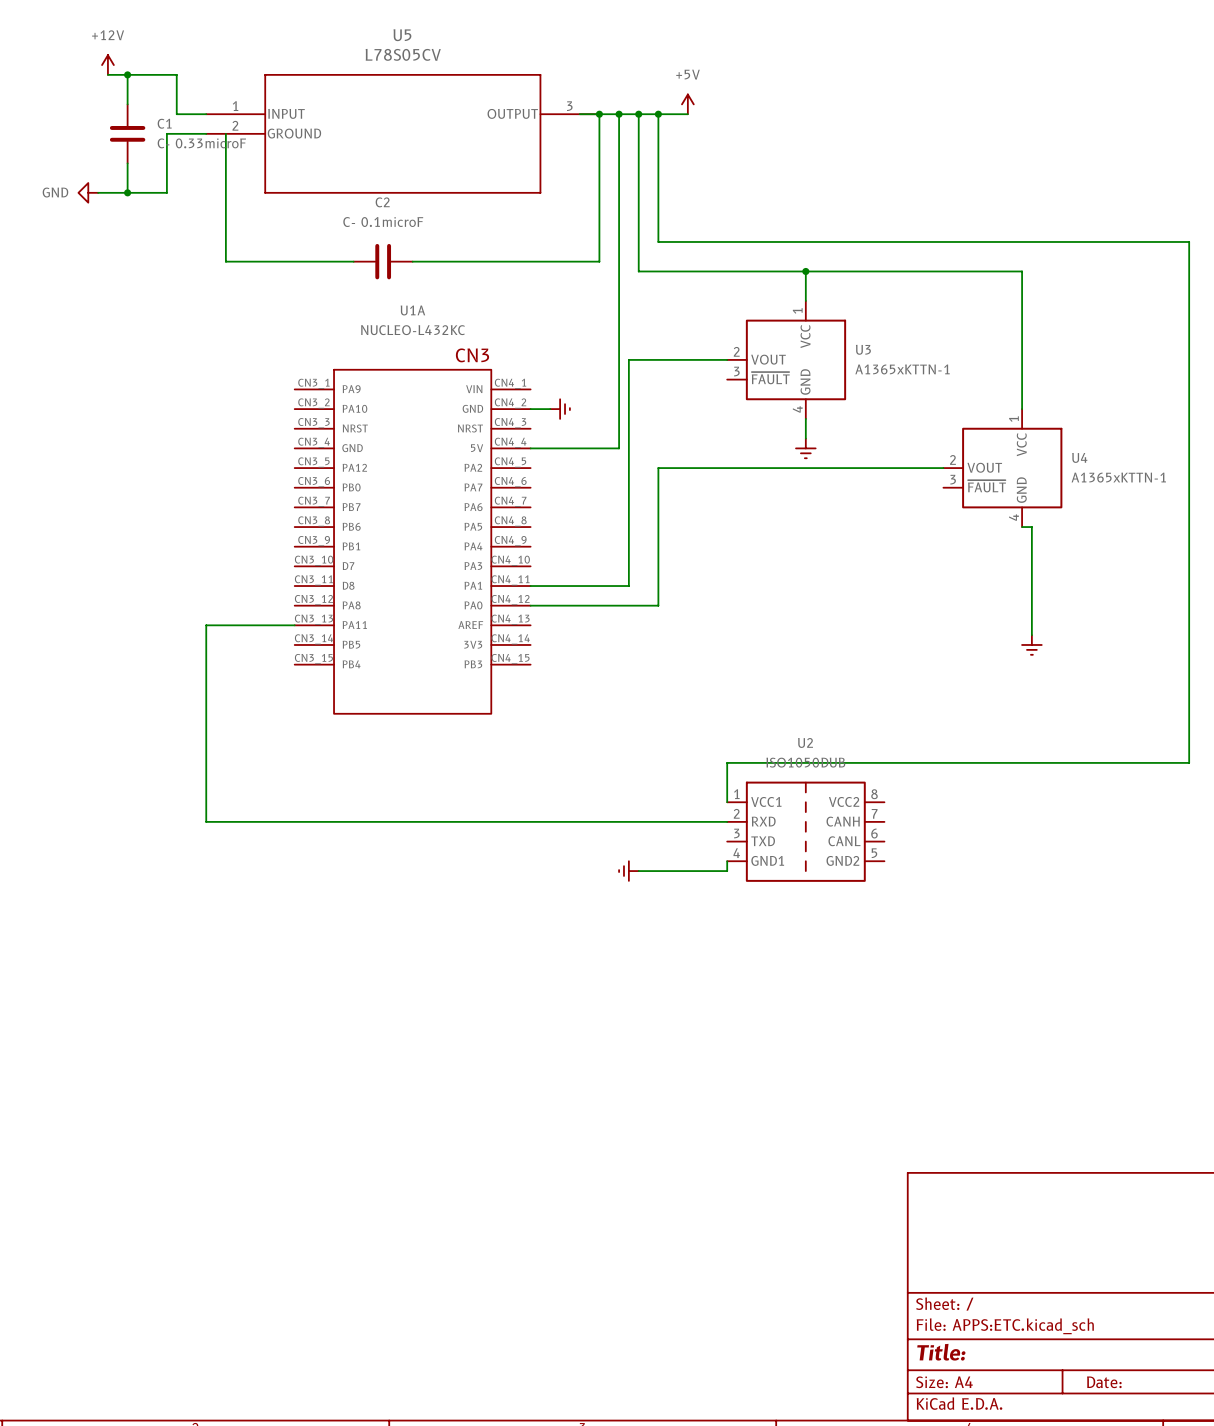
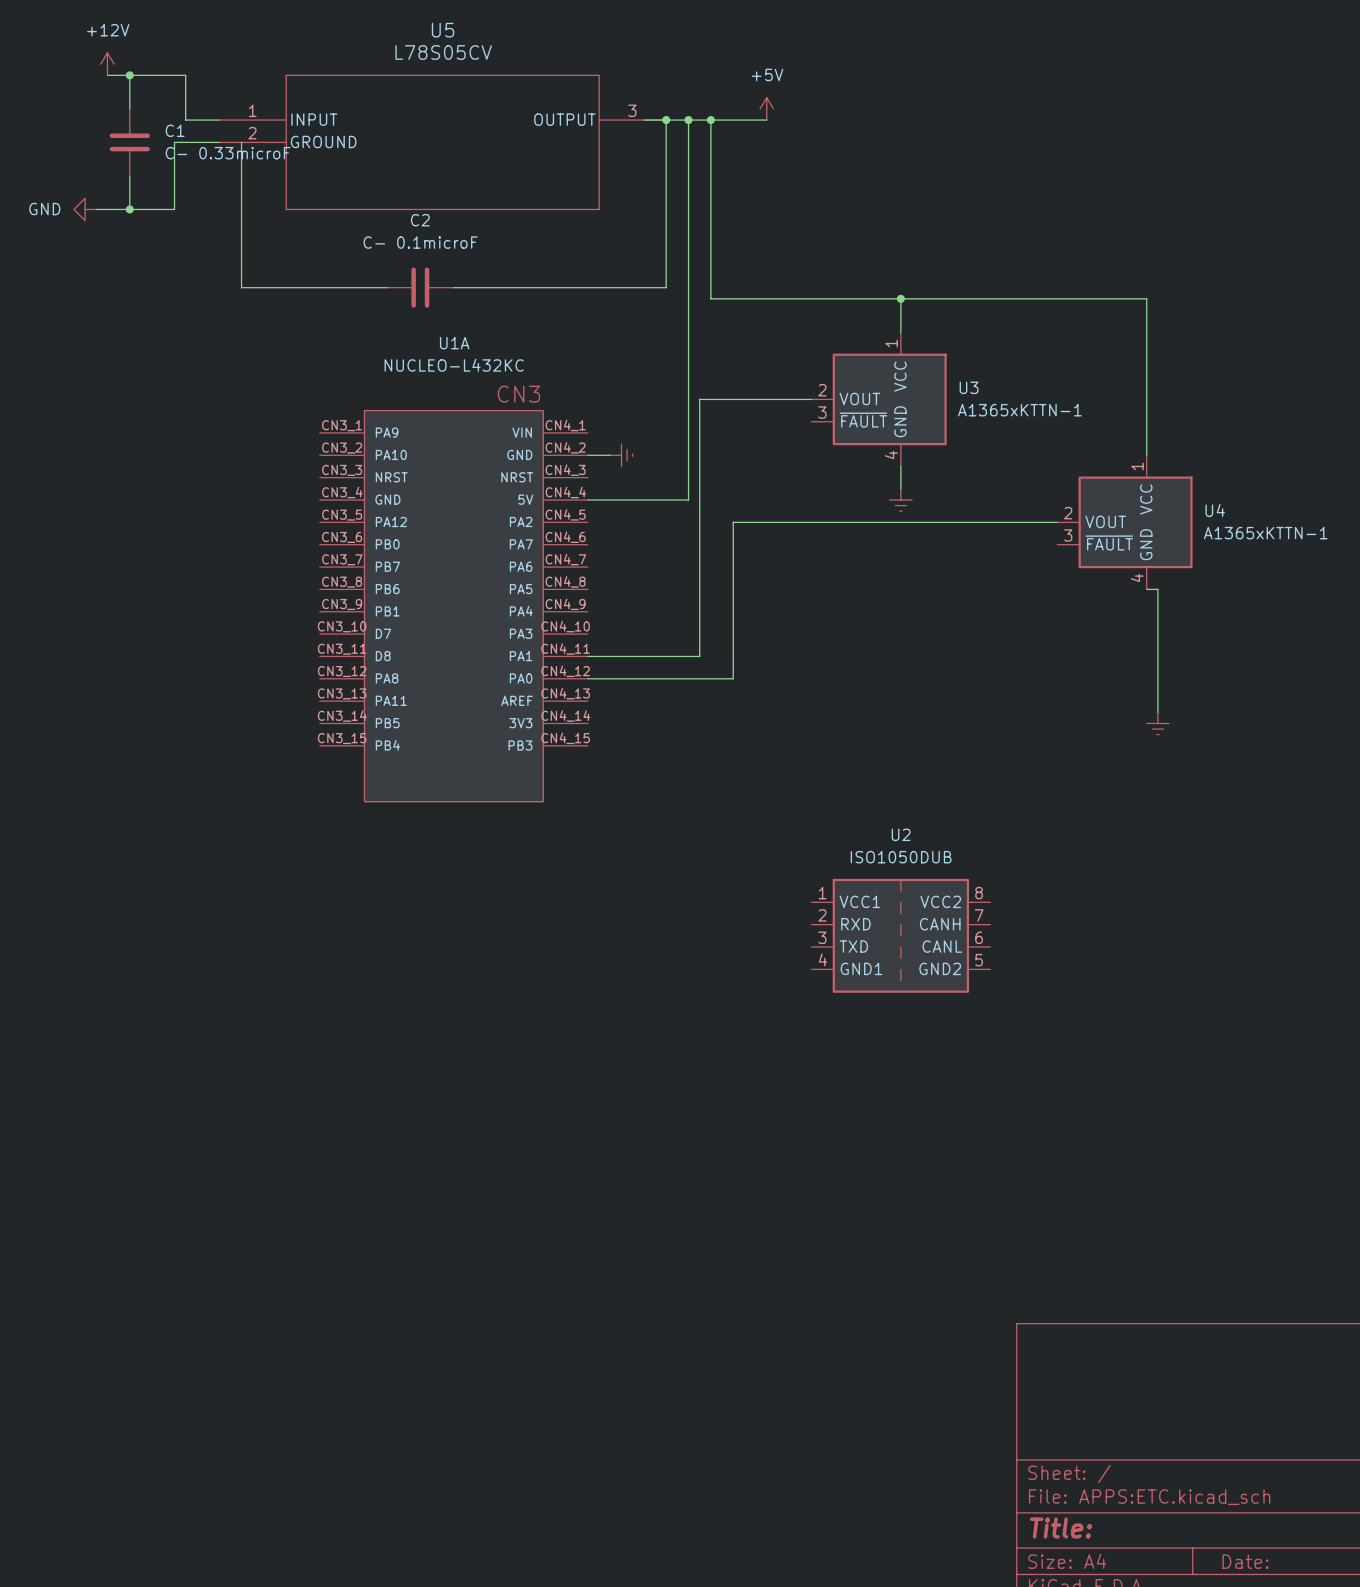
wire: (658, 114) (658, 241) (1189, 241) (1189, 762) (727, 762) (727, 802) -> none
junction: (658, 114) -> none
wire: (294, 625) (206, 625) (206, 821) (727, 821) -> none
wire: (727, 861) (727, 871) (638, 871) -> none
power symbol: (628, 871) -> none

